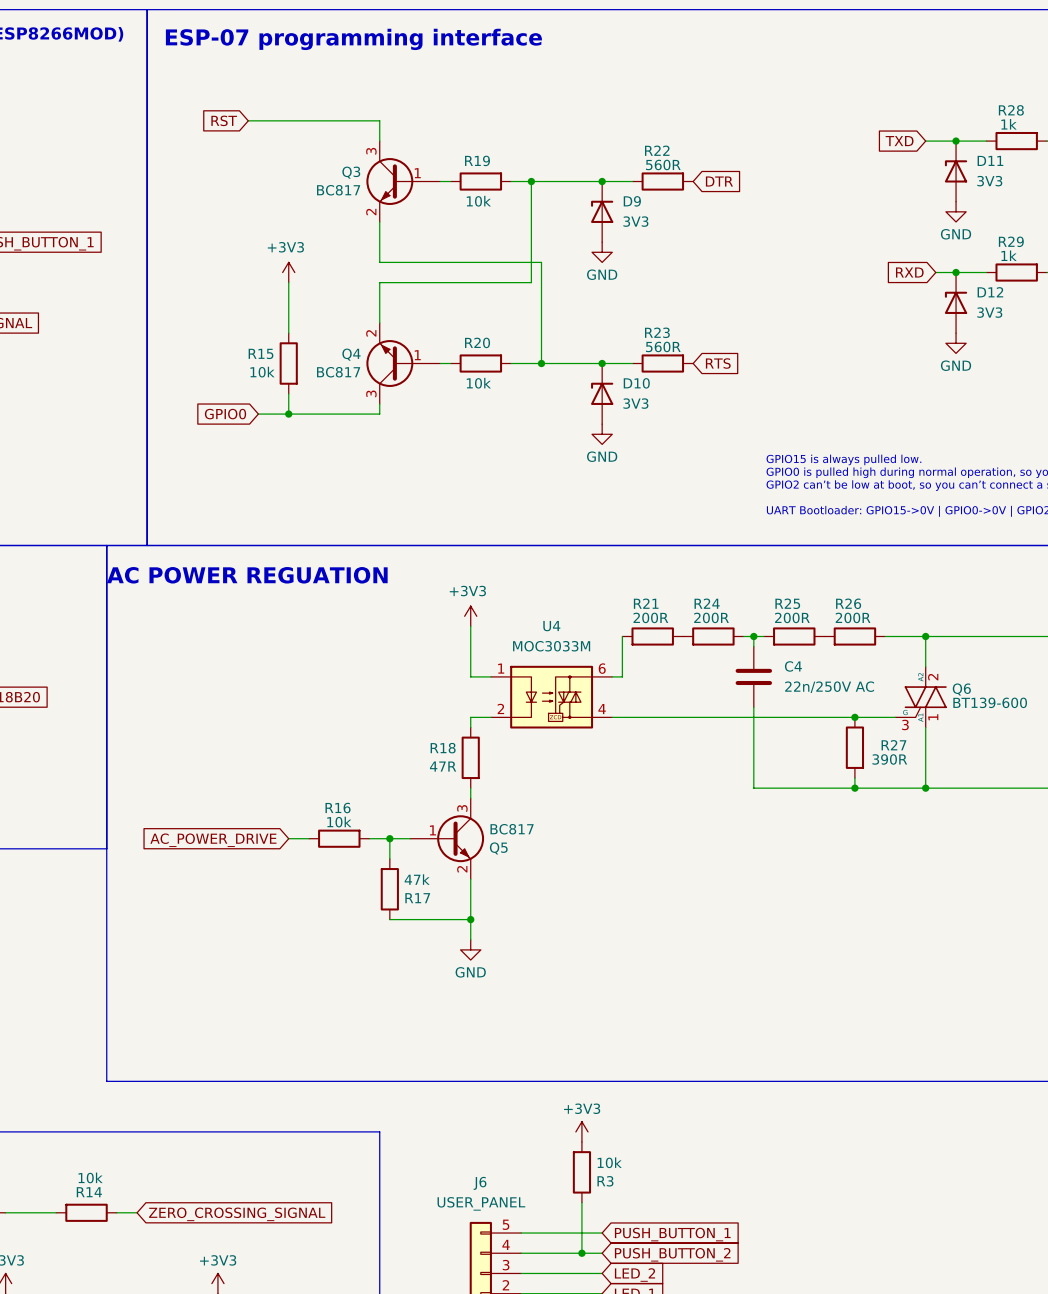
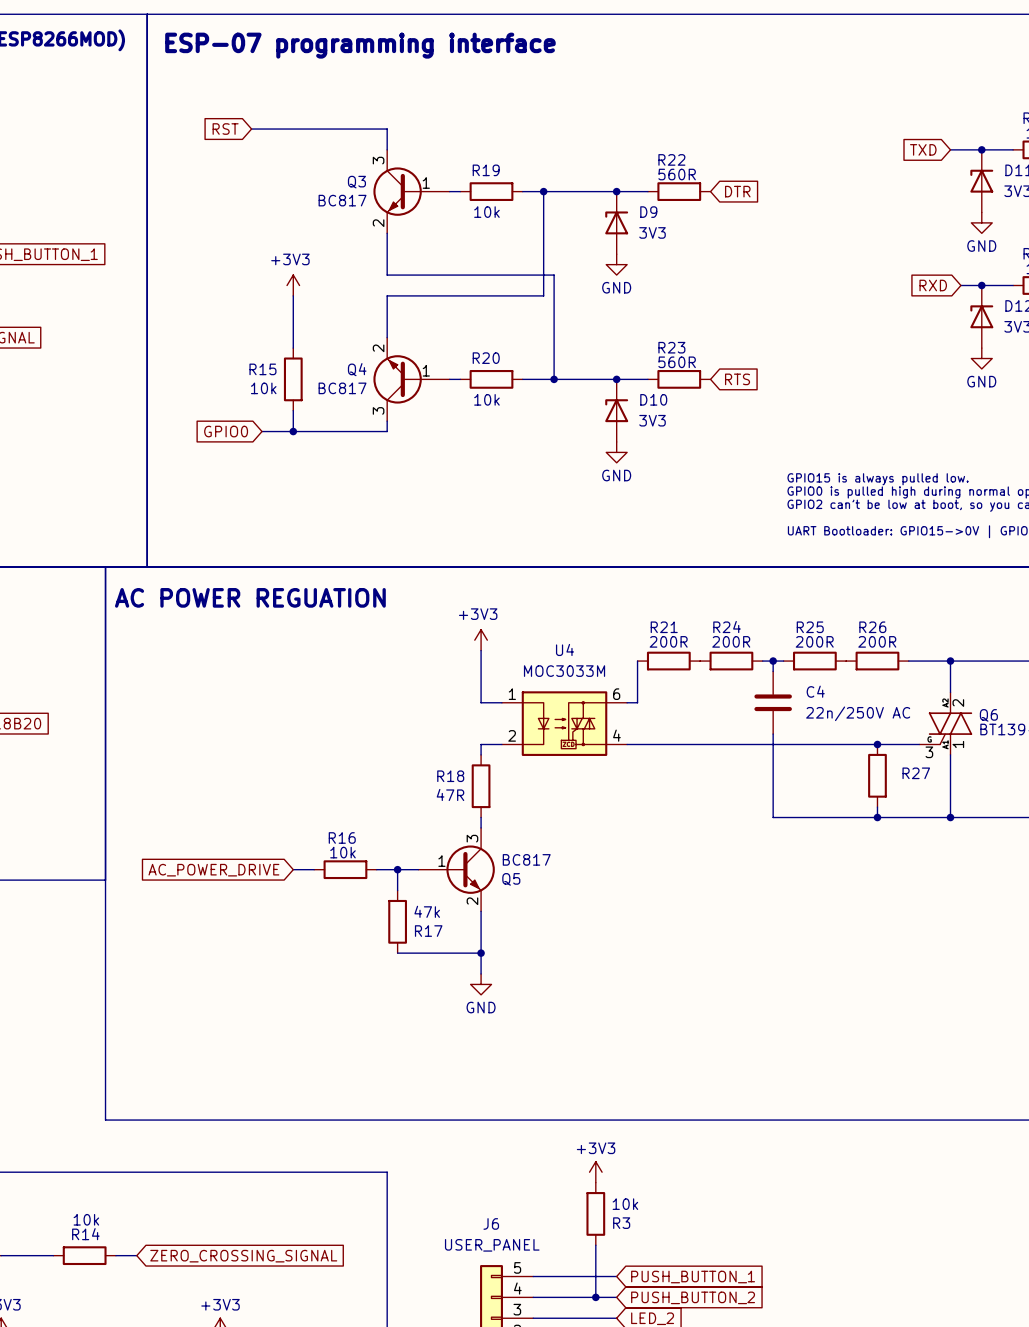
R27 value: 390R (889, 759) -> none

